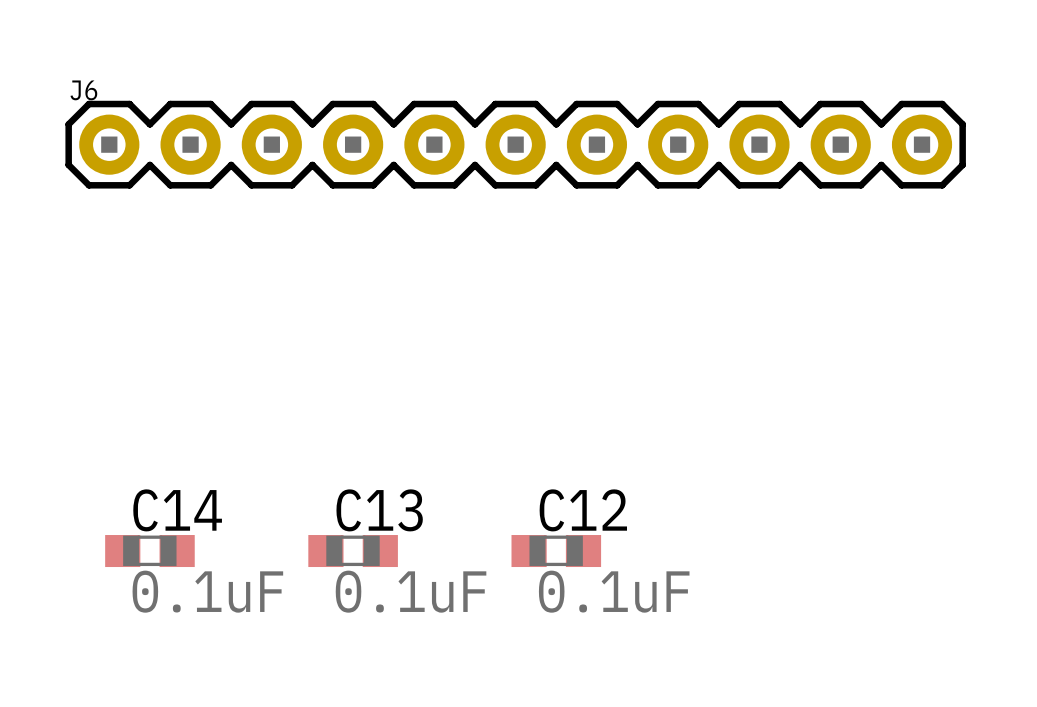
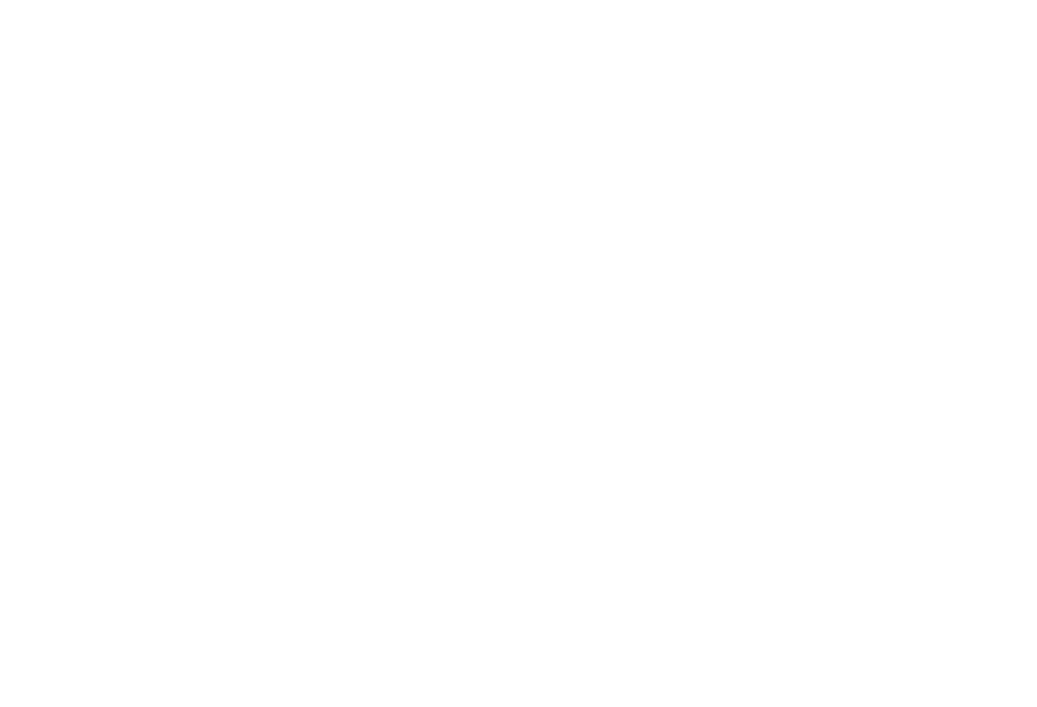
J6: (515, 144) -> none
C14: 0.1uF (149, 551) -> none
C13: 0.1uF (353, 551) -> none
C12: 0.1uF (556, 551) -> none

